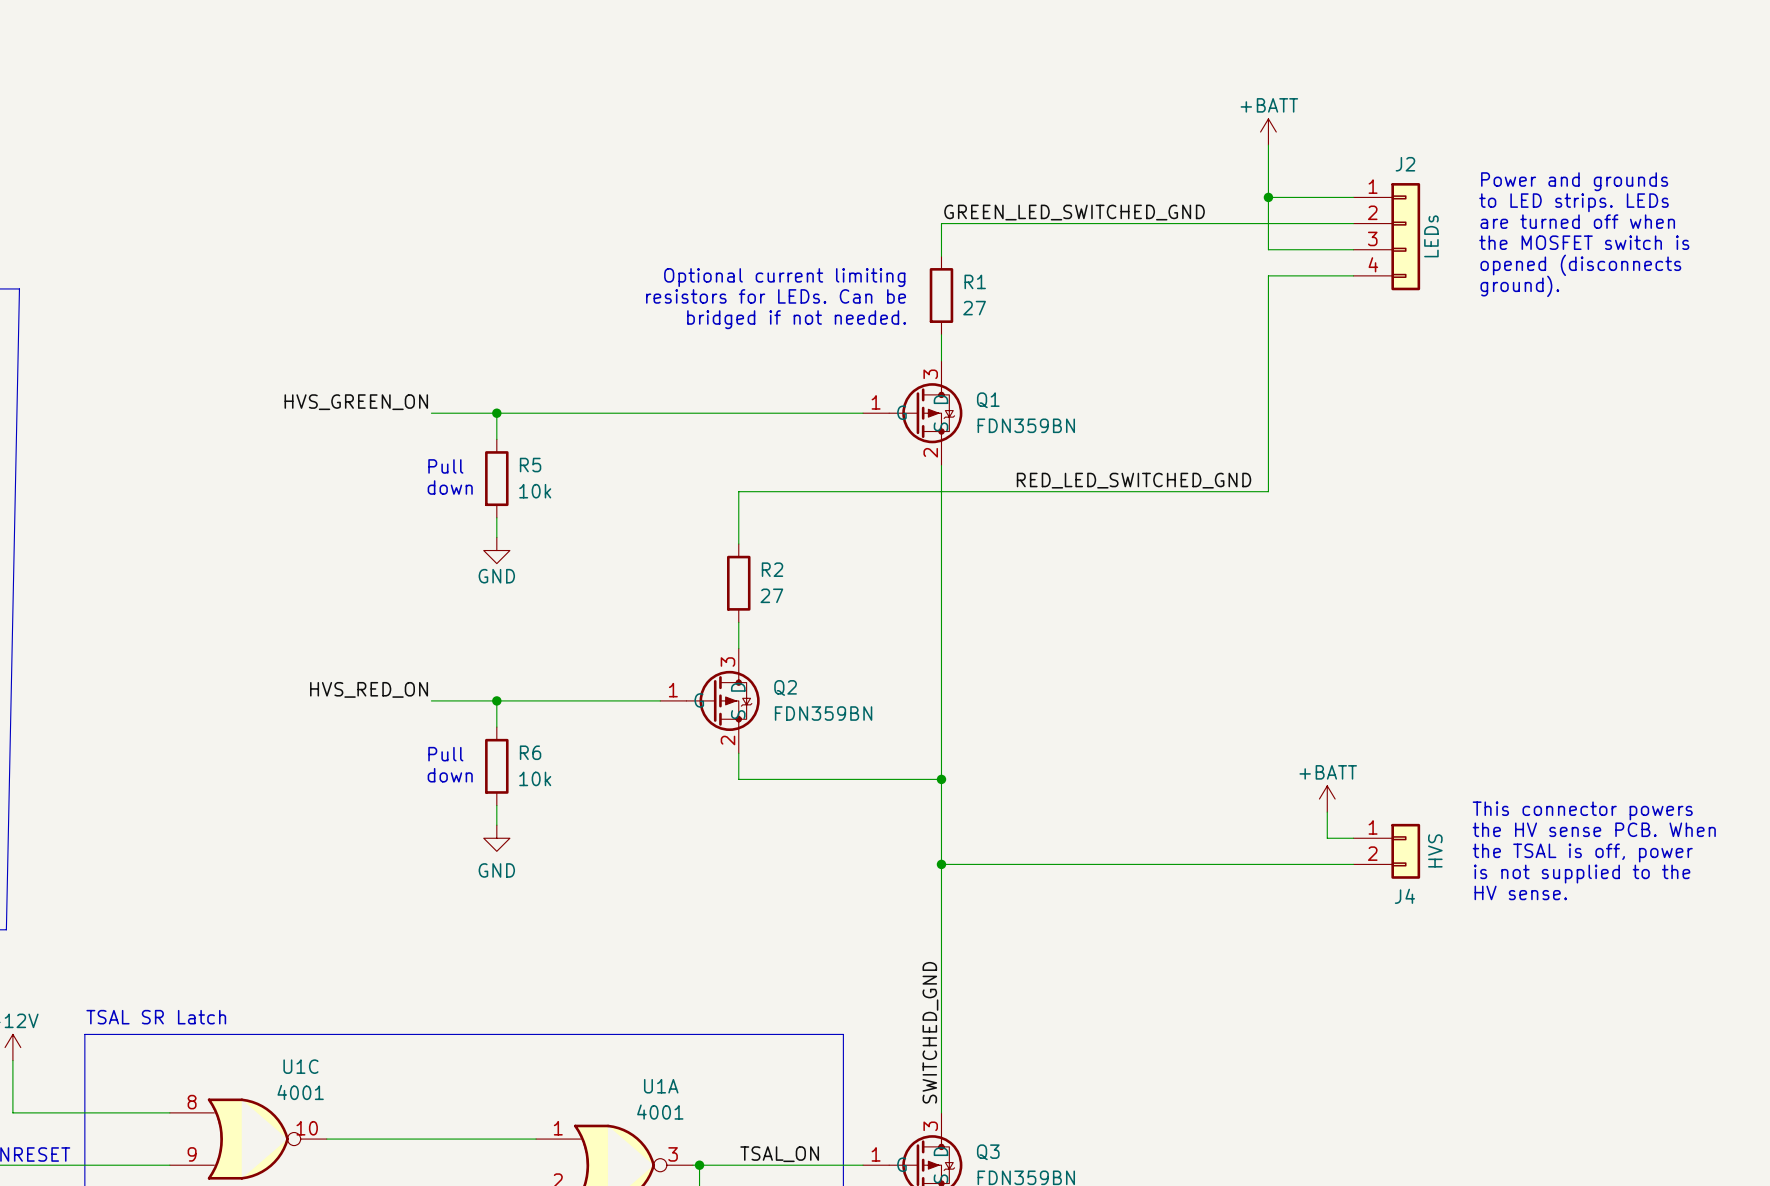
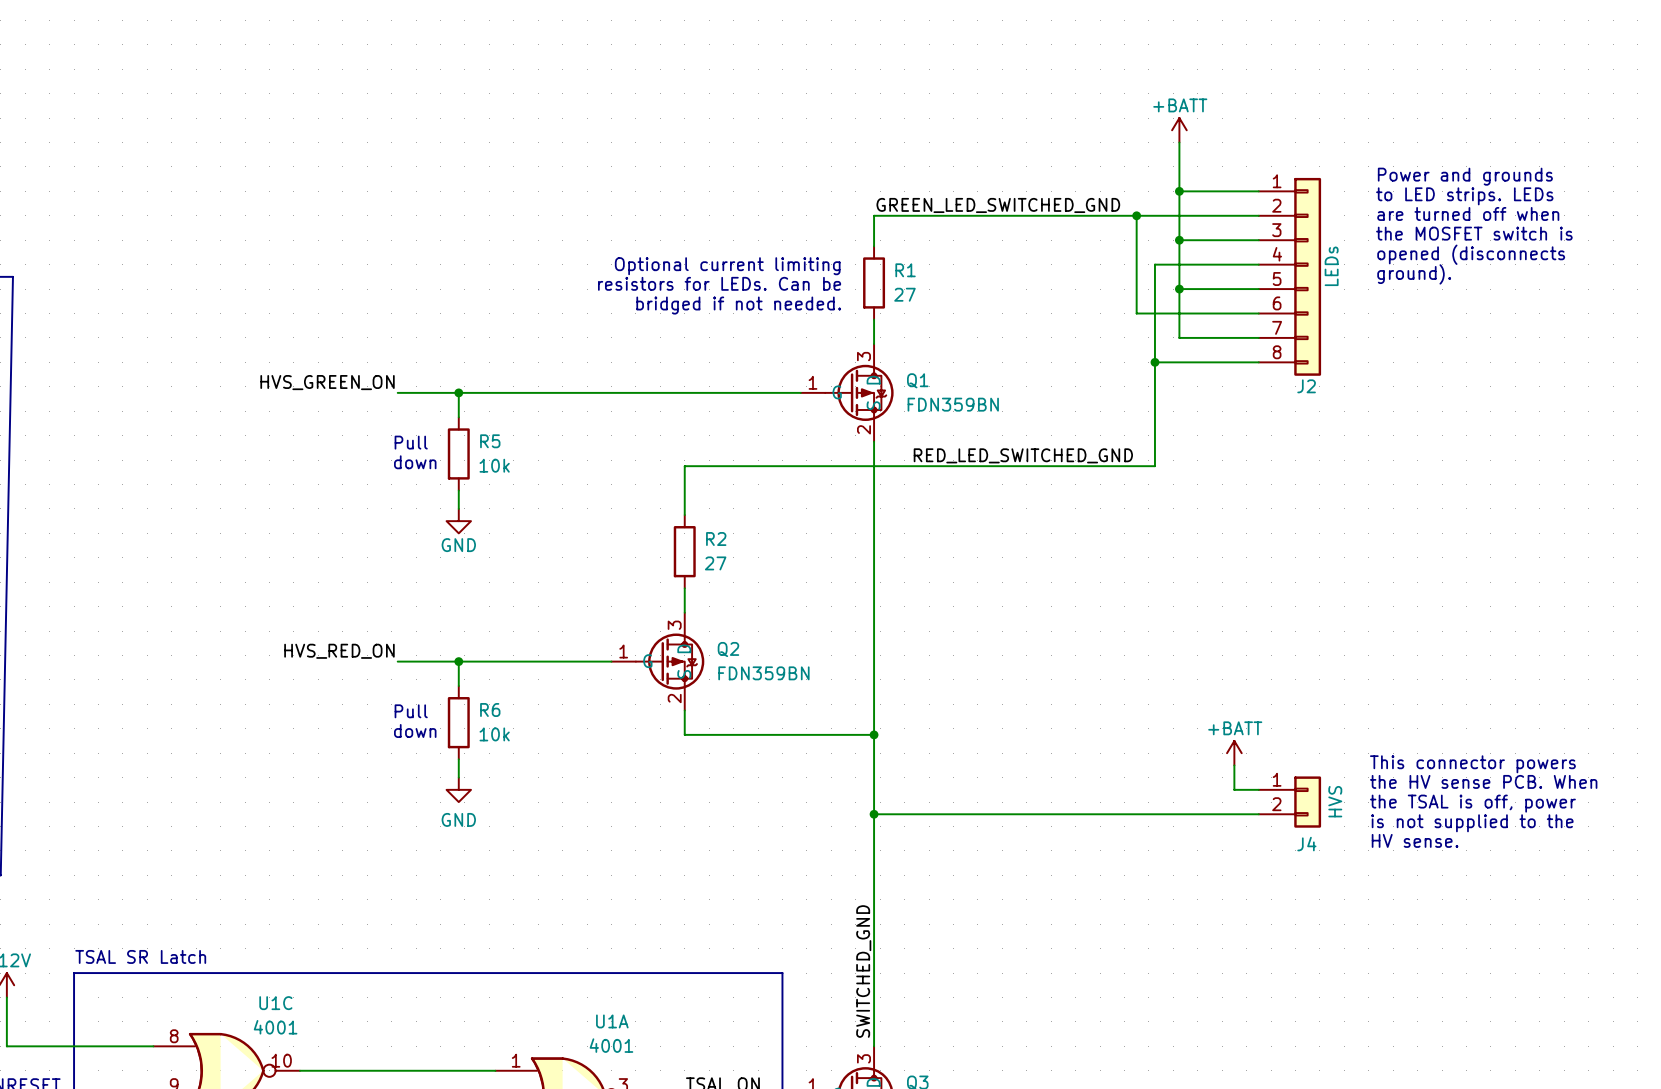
J2 name position: J2 (1405, 164) -> J2 (1306, 386)
J2 symbol: [1353, 183, 1421, 291] -> [1258, 177, 1322, 376]
wire: none -> (1136, 215) (1136, 313) (1258, 313)
junction: none -> (1136, 215)
junction: none -> (1179, 240)
wire: none -> (1179, 289) (1258, 289)
junction: none -> (1179, 289)
wire: (1268, 354) (1268, 491) (1242, 491) -> (1179, 240) (1179, 264) (1154, 264) (1154, 466)
wire: none -> (1179, 337) (1258, 337)
wire: none -> (1154, 362) (1258, 362)
junction: none -> (1154, 362)
label position: RED_LED_SWITCHED_GND (1134, 480) -> RED_LED_SWITCHED_GND (1023, 455)

